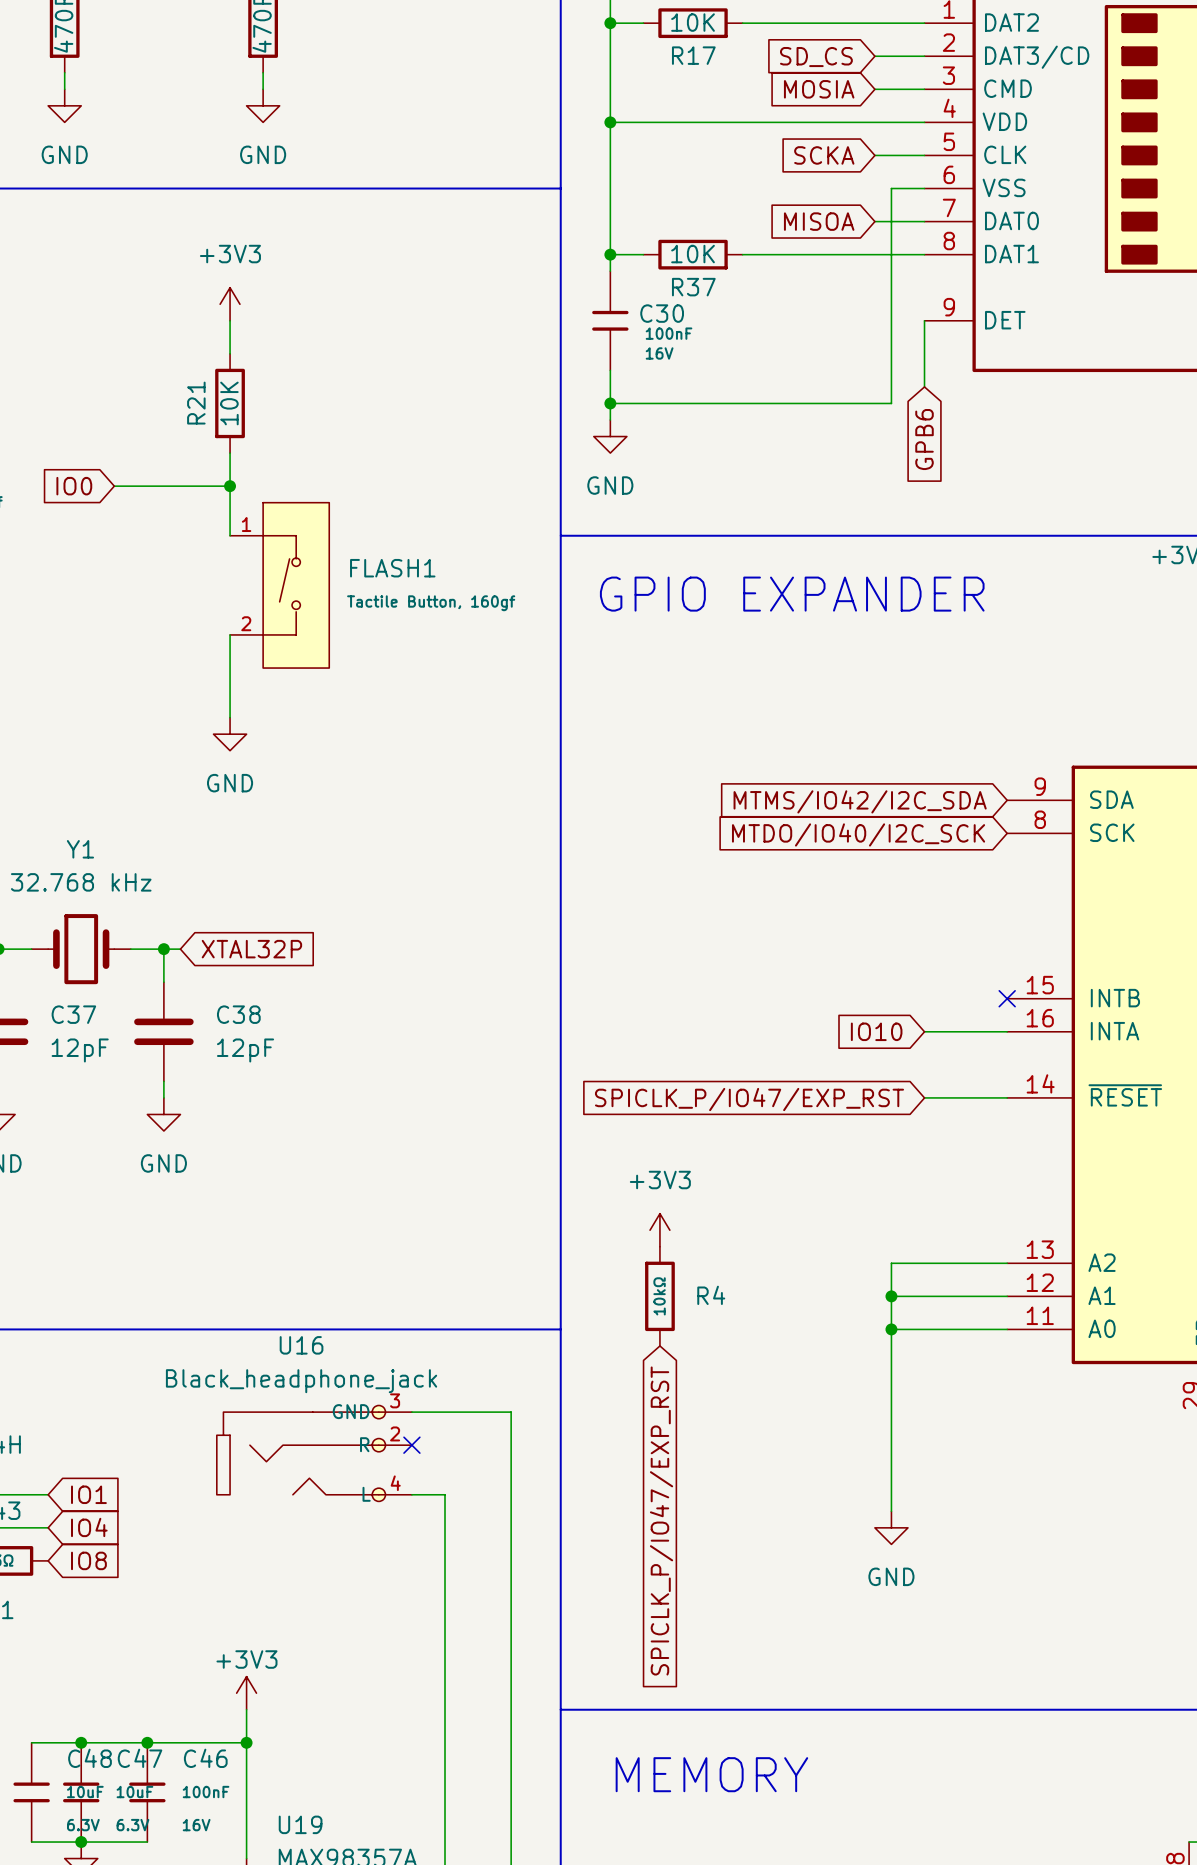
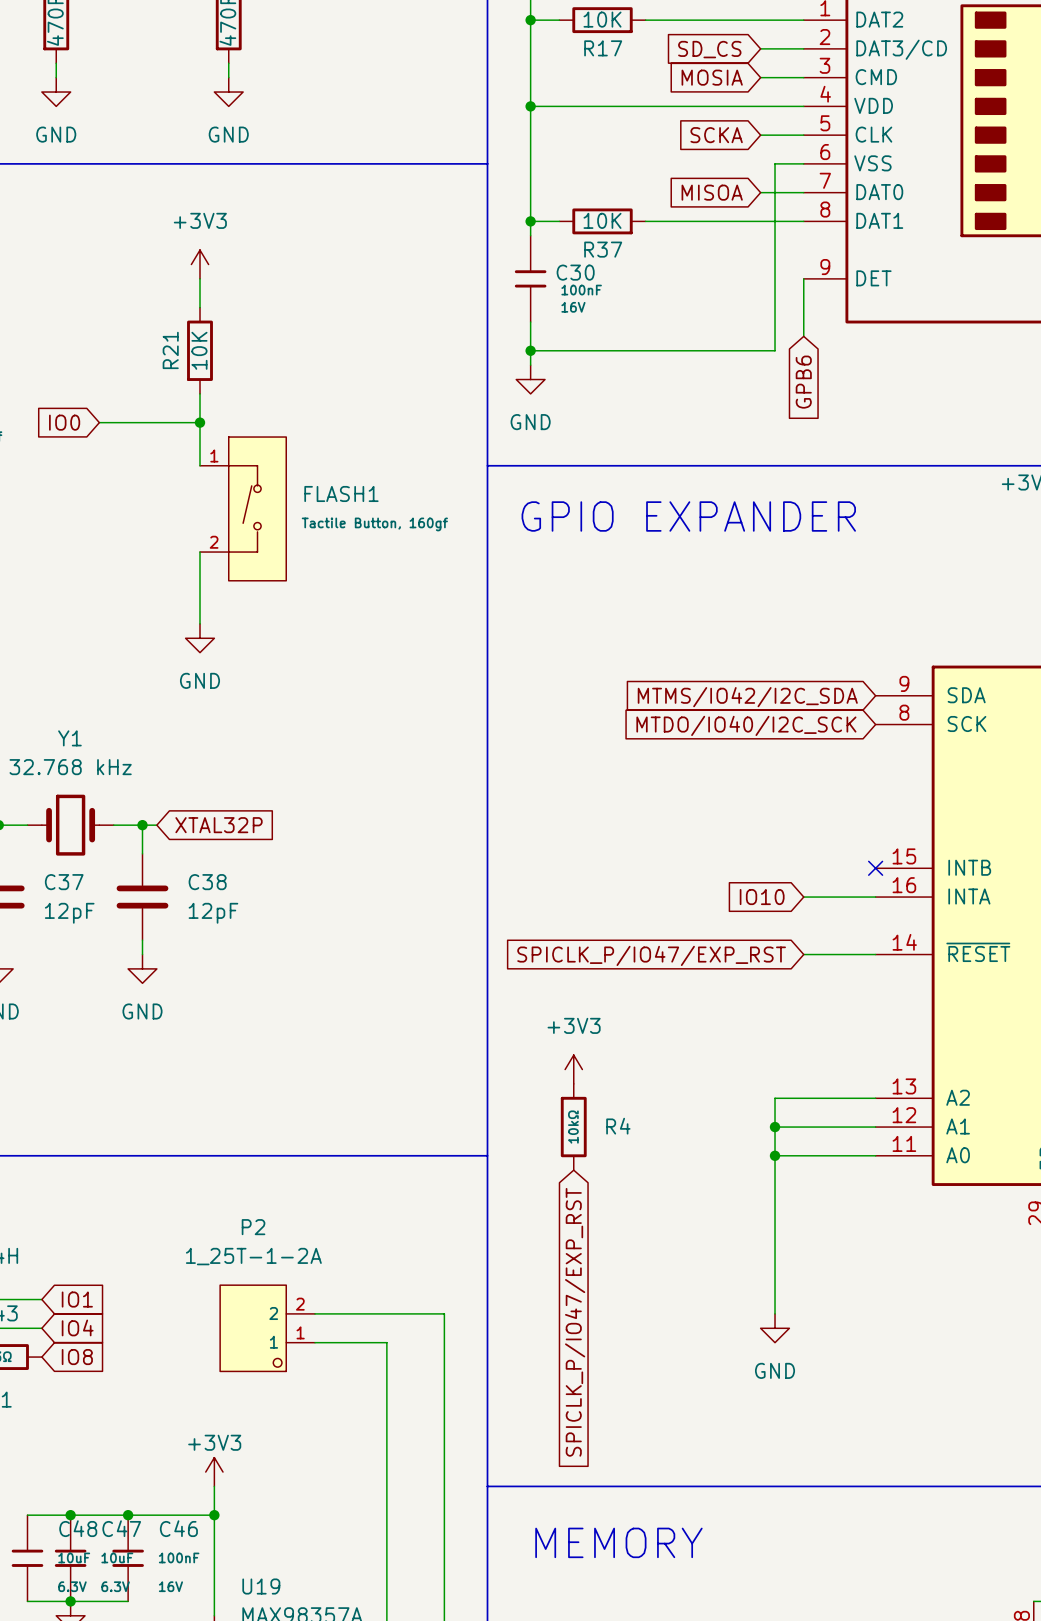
wire: (411, 1412) (511, 1412) (511, 1511) -> (315, 1313) (444, 1313)
no-connect mark: (411, 1445) -> none
U16: Black_headphone_jack (314, 1453) -> none
wire: (411, 1494) (445, 1494) (445, 1544) -> (315, 1342) (386, 1342)
P2: none -> 1_25T-1-2A (267, 1328)

